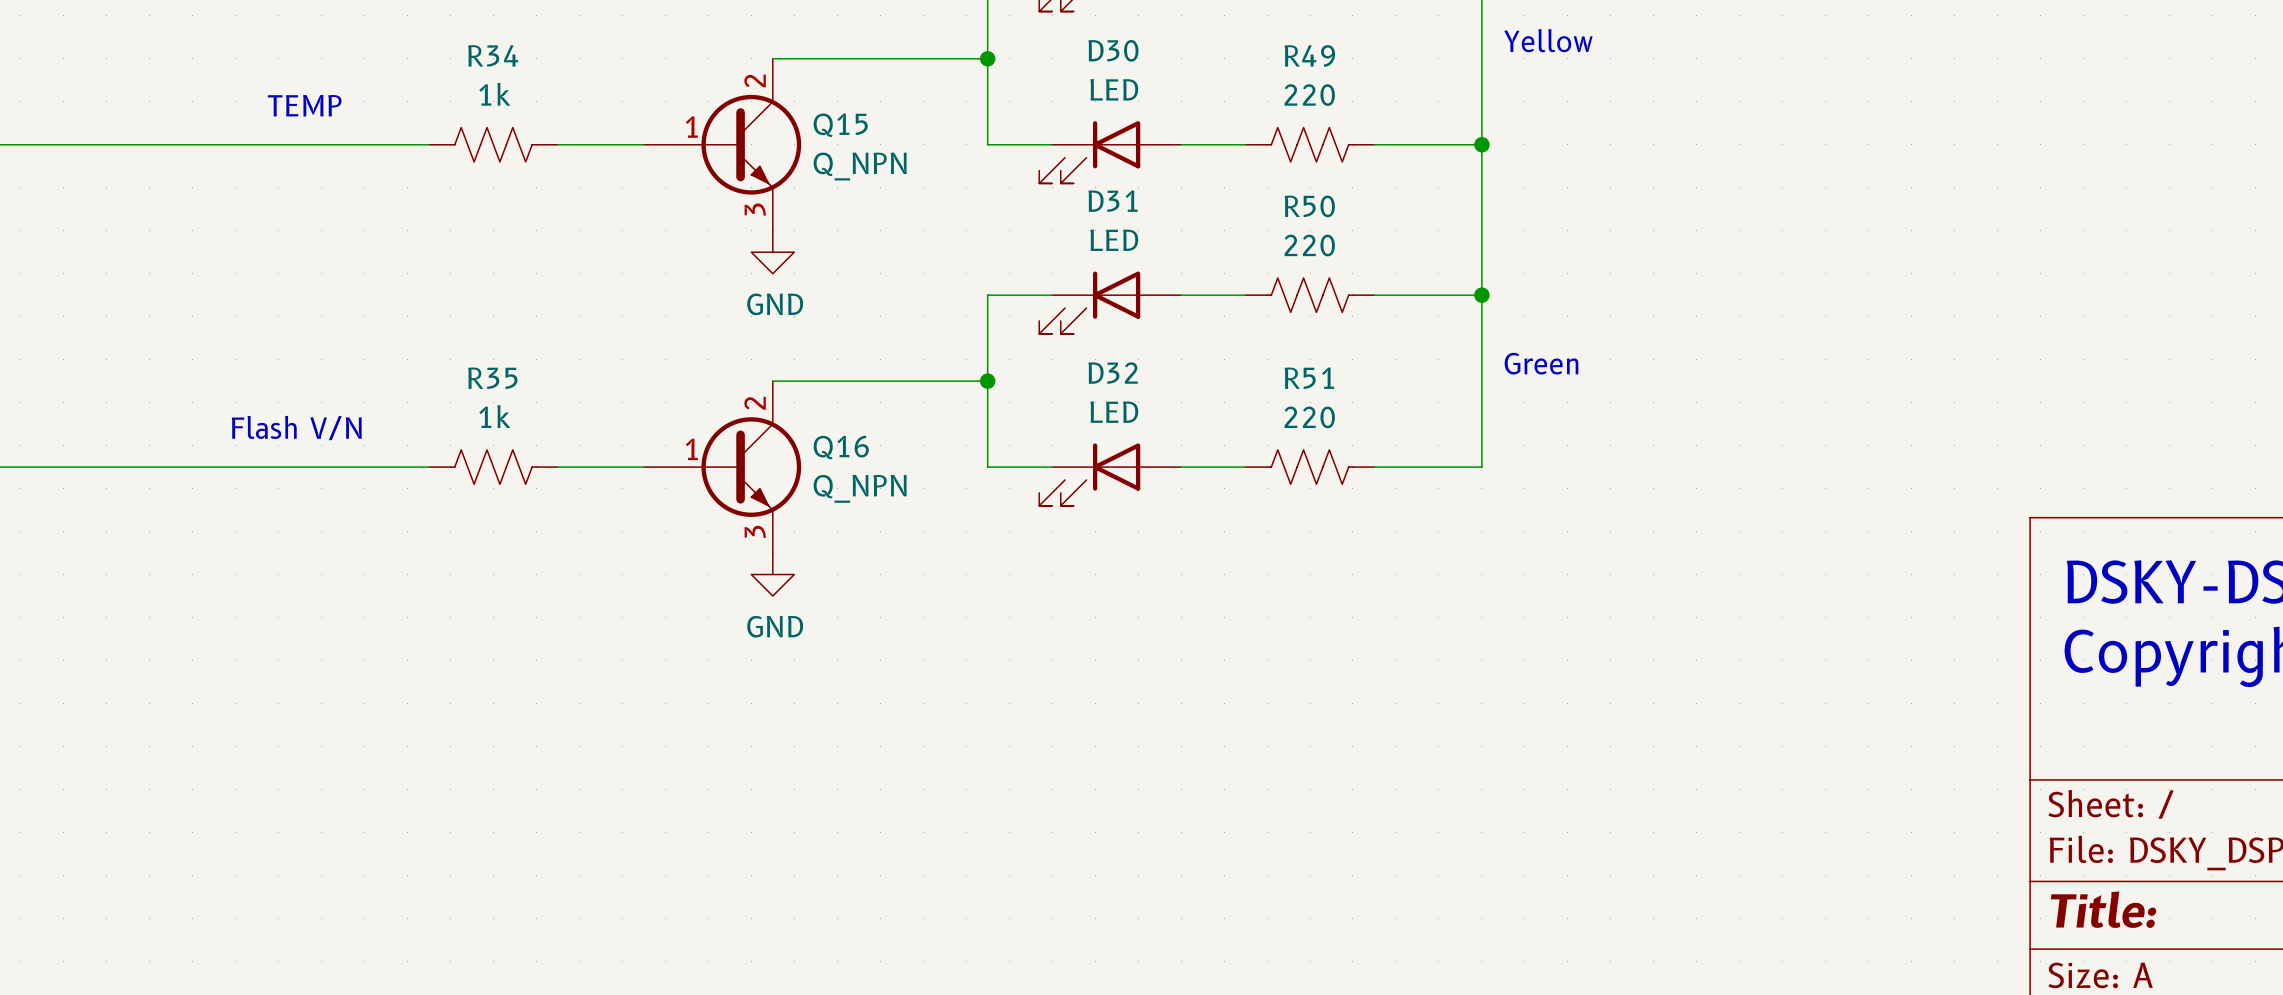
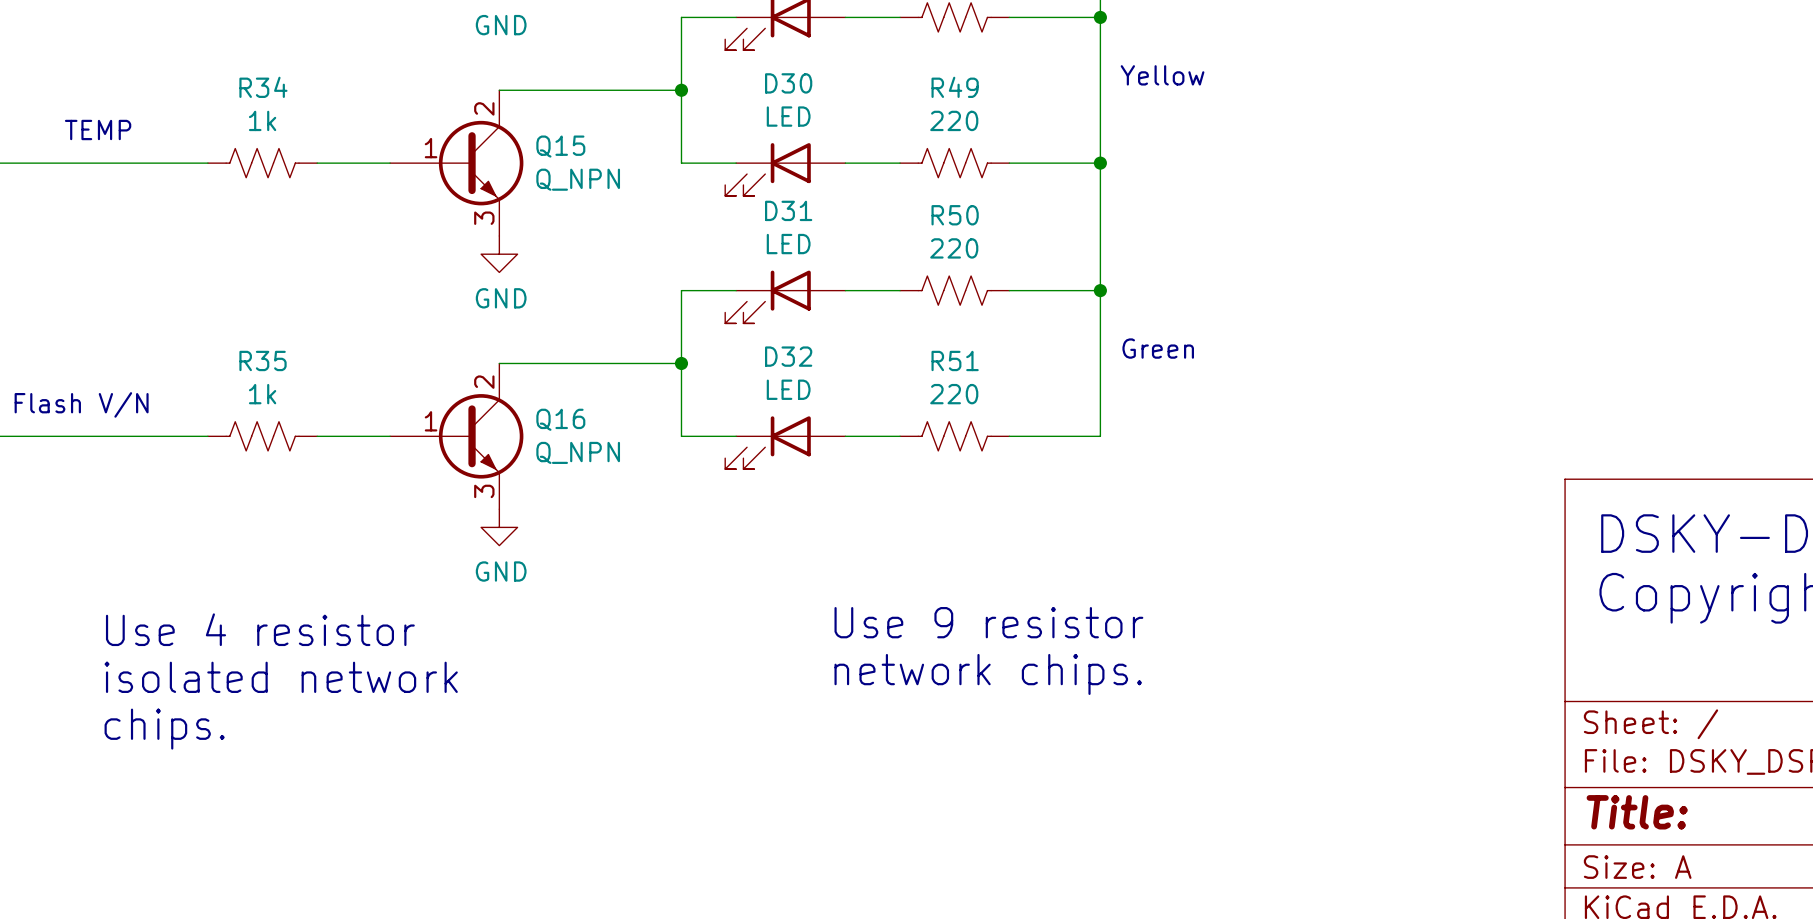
text: none -> Use 9 resistor (988, 622)
text: none -> Use 4 resistor (260, 629)
text: none -> network chips. (988, 674)
text: none -> isolated network (281, 677)
text: none -> chips. (164, 729)

